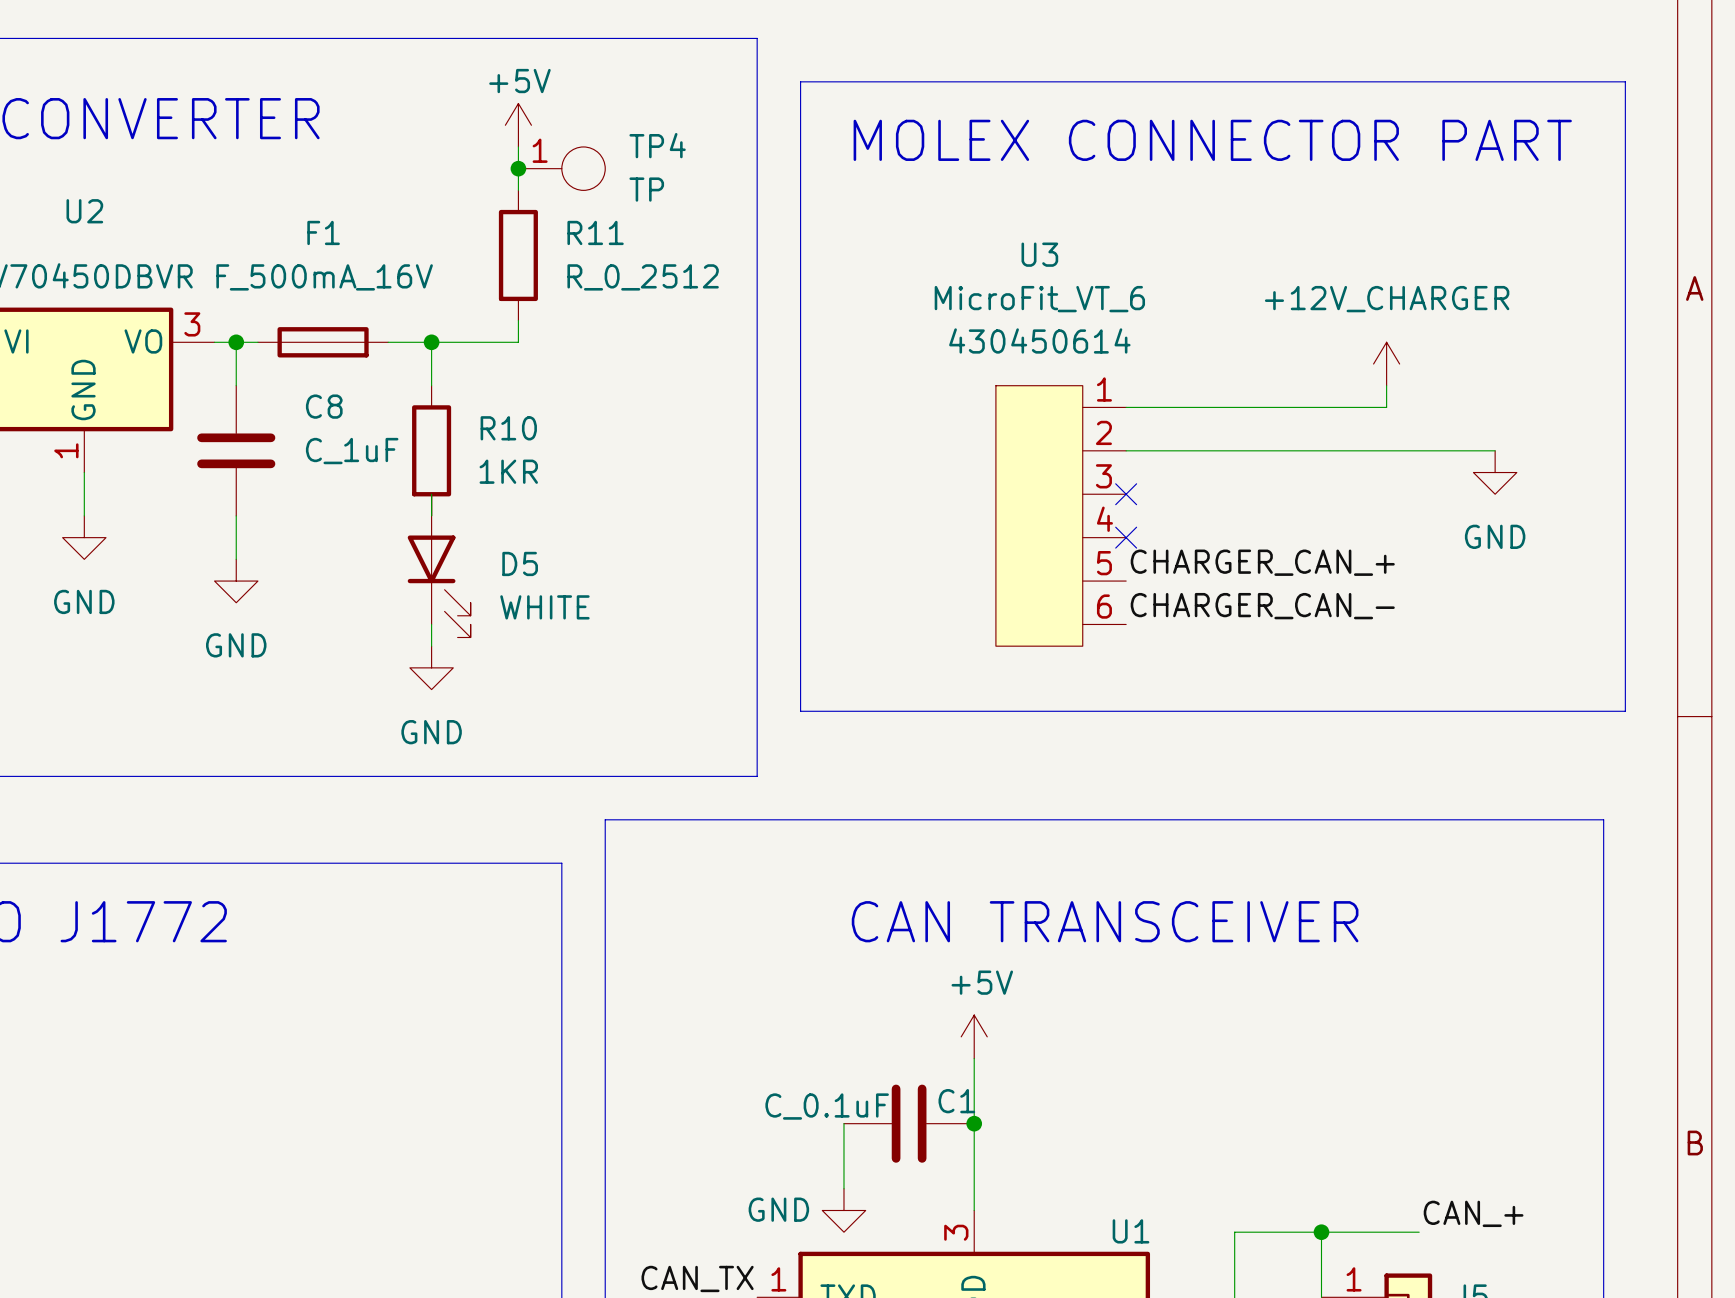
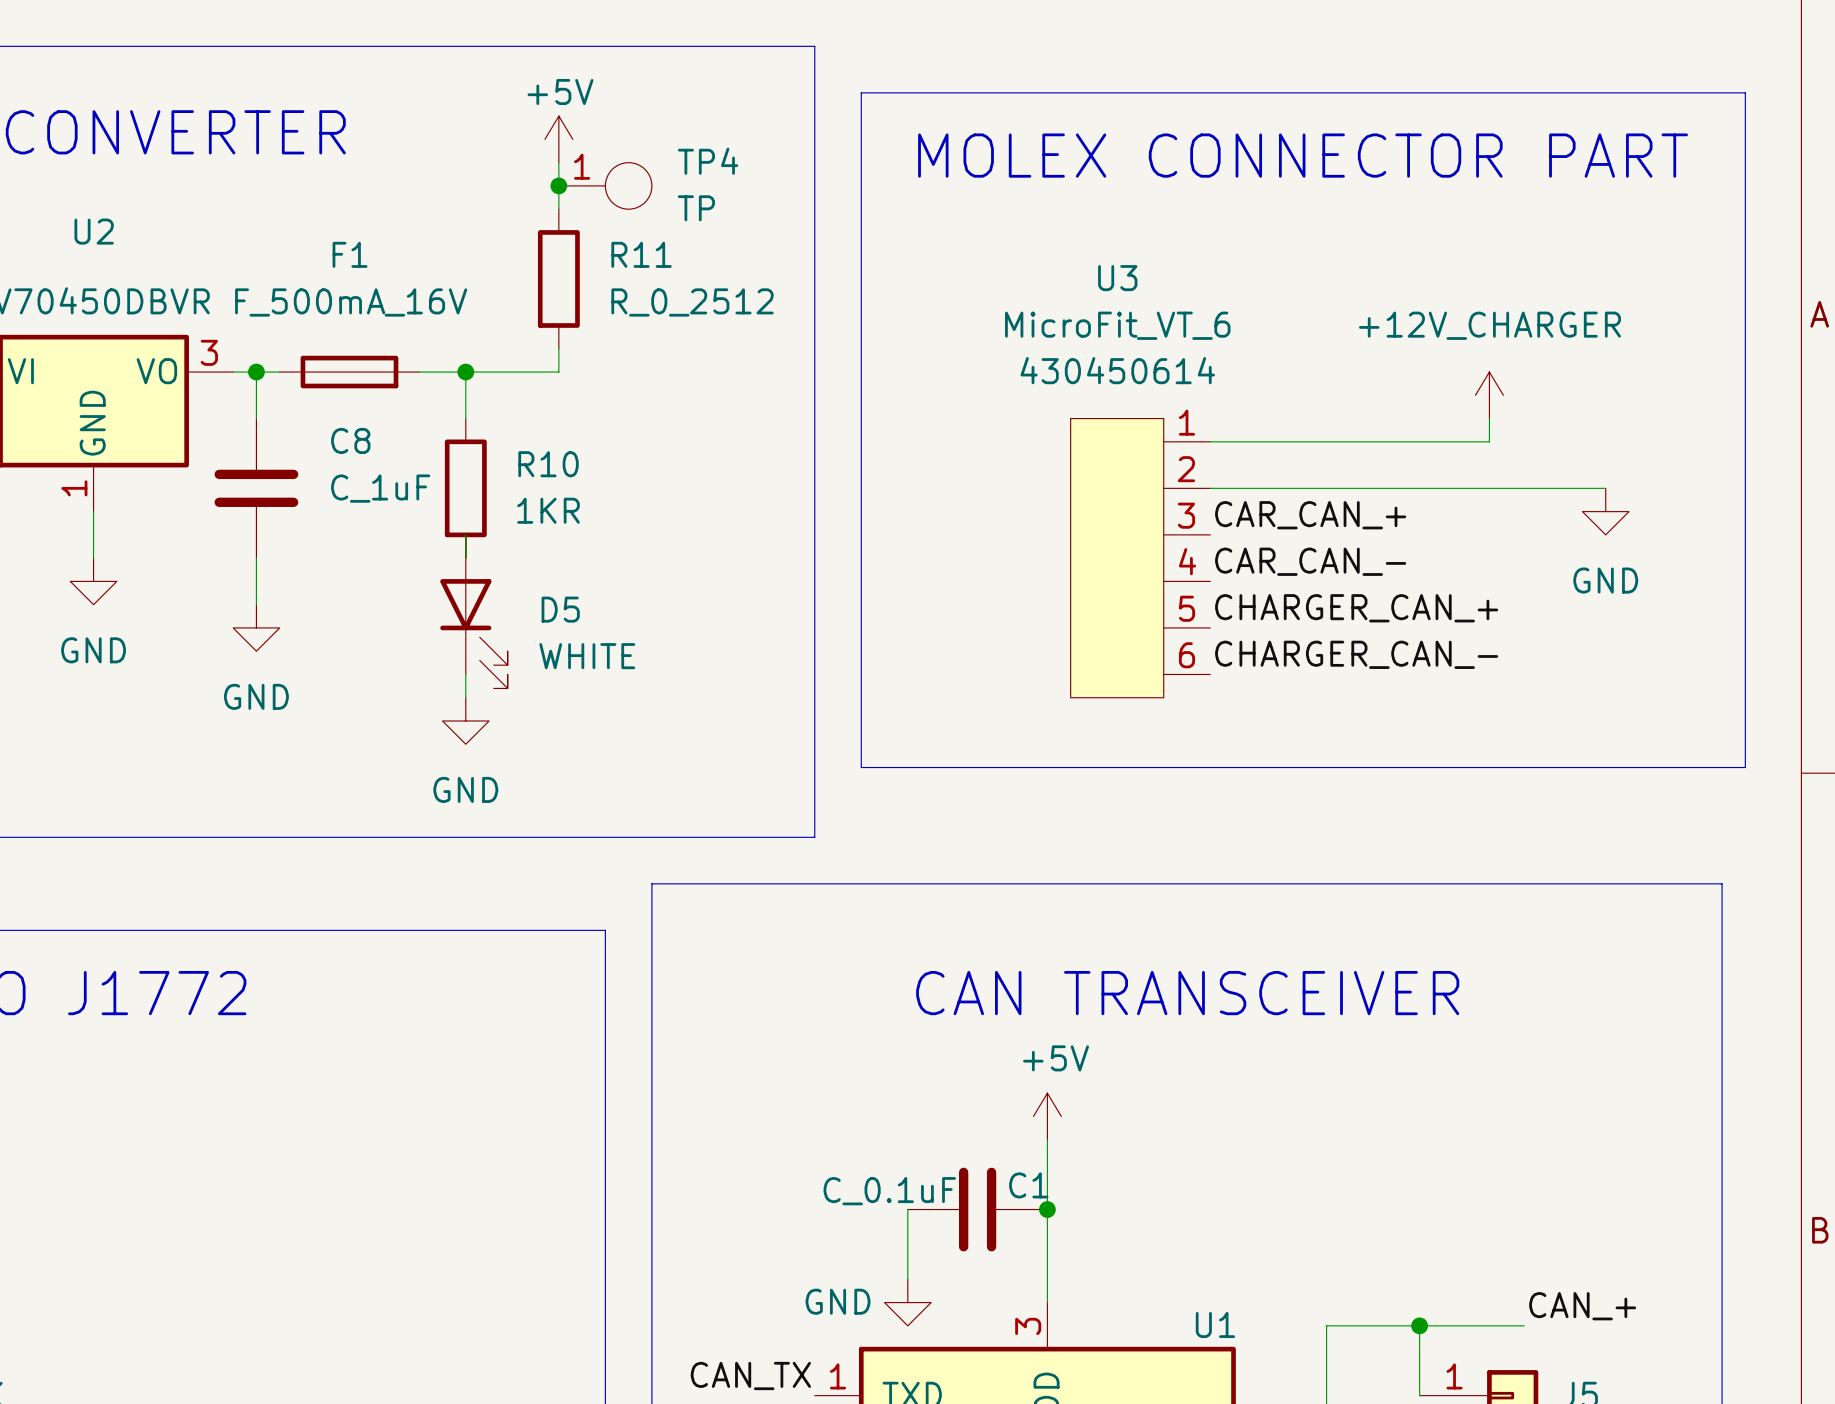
label: none -> CAR_CAN_+ (1310, 515)
no-connect mark: (1126, 494) -> none
label: none -> CAR_CAN_- (1310, 561)
no-connect mark: (1126, 537) -> none

